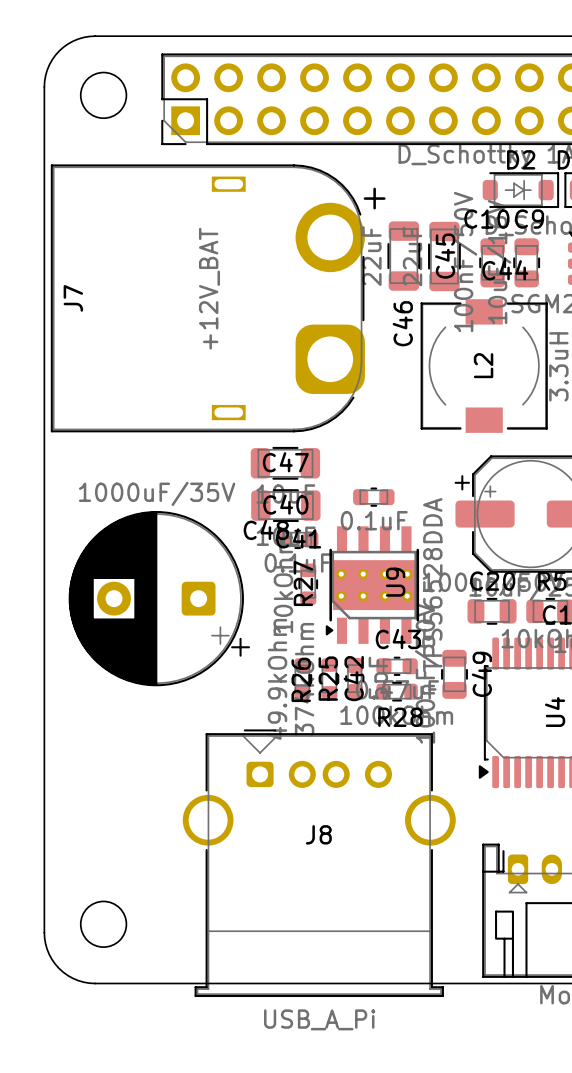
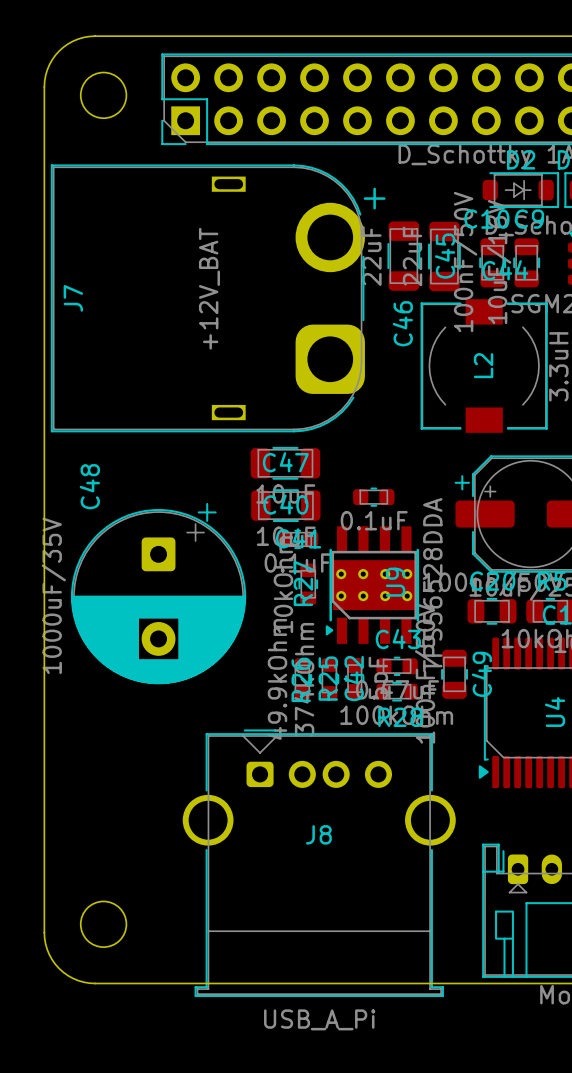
C48 rotation: 0° (159, 598) -> 90° counterclockwise (158, 593)

